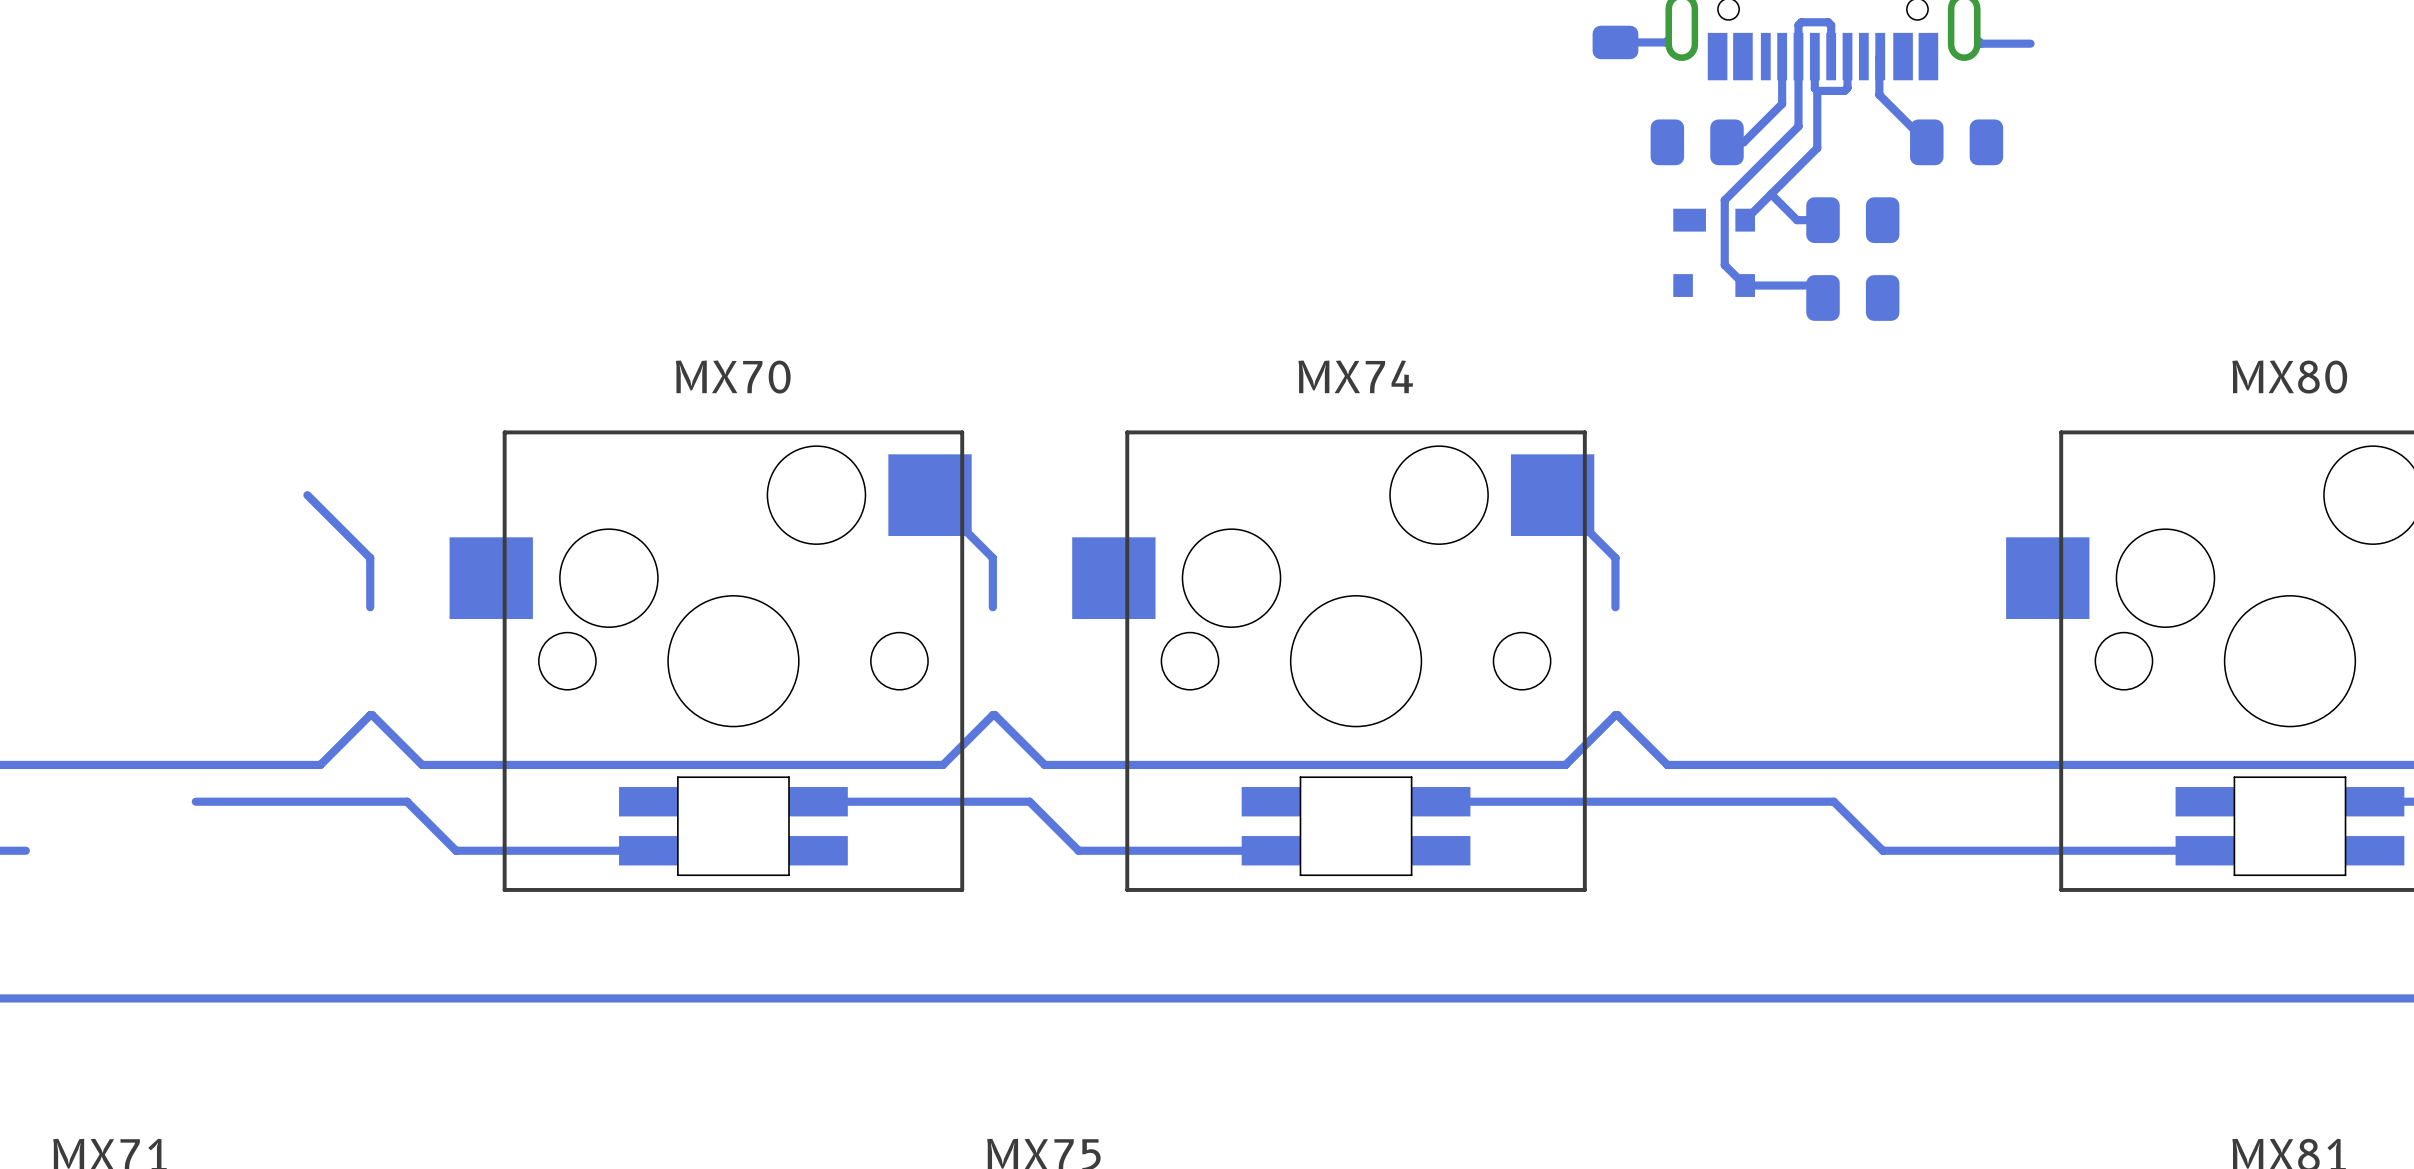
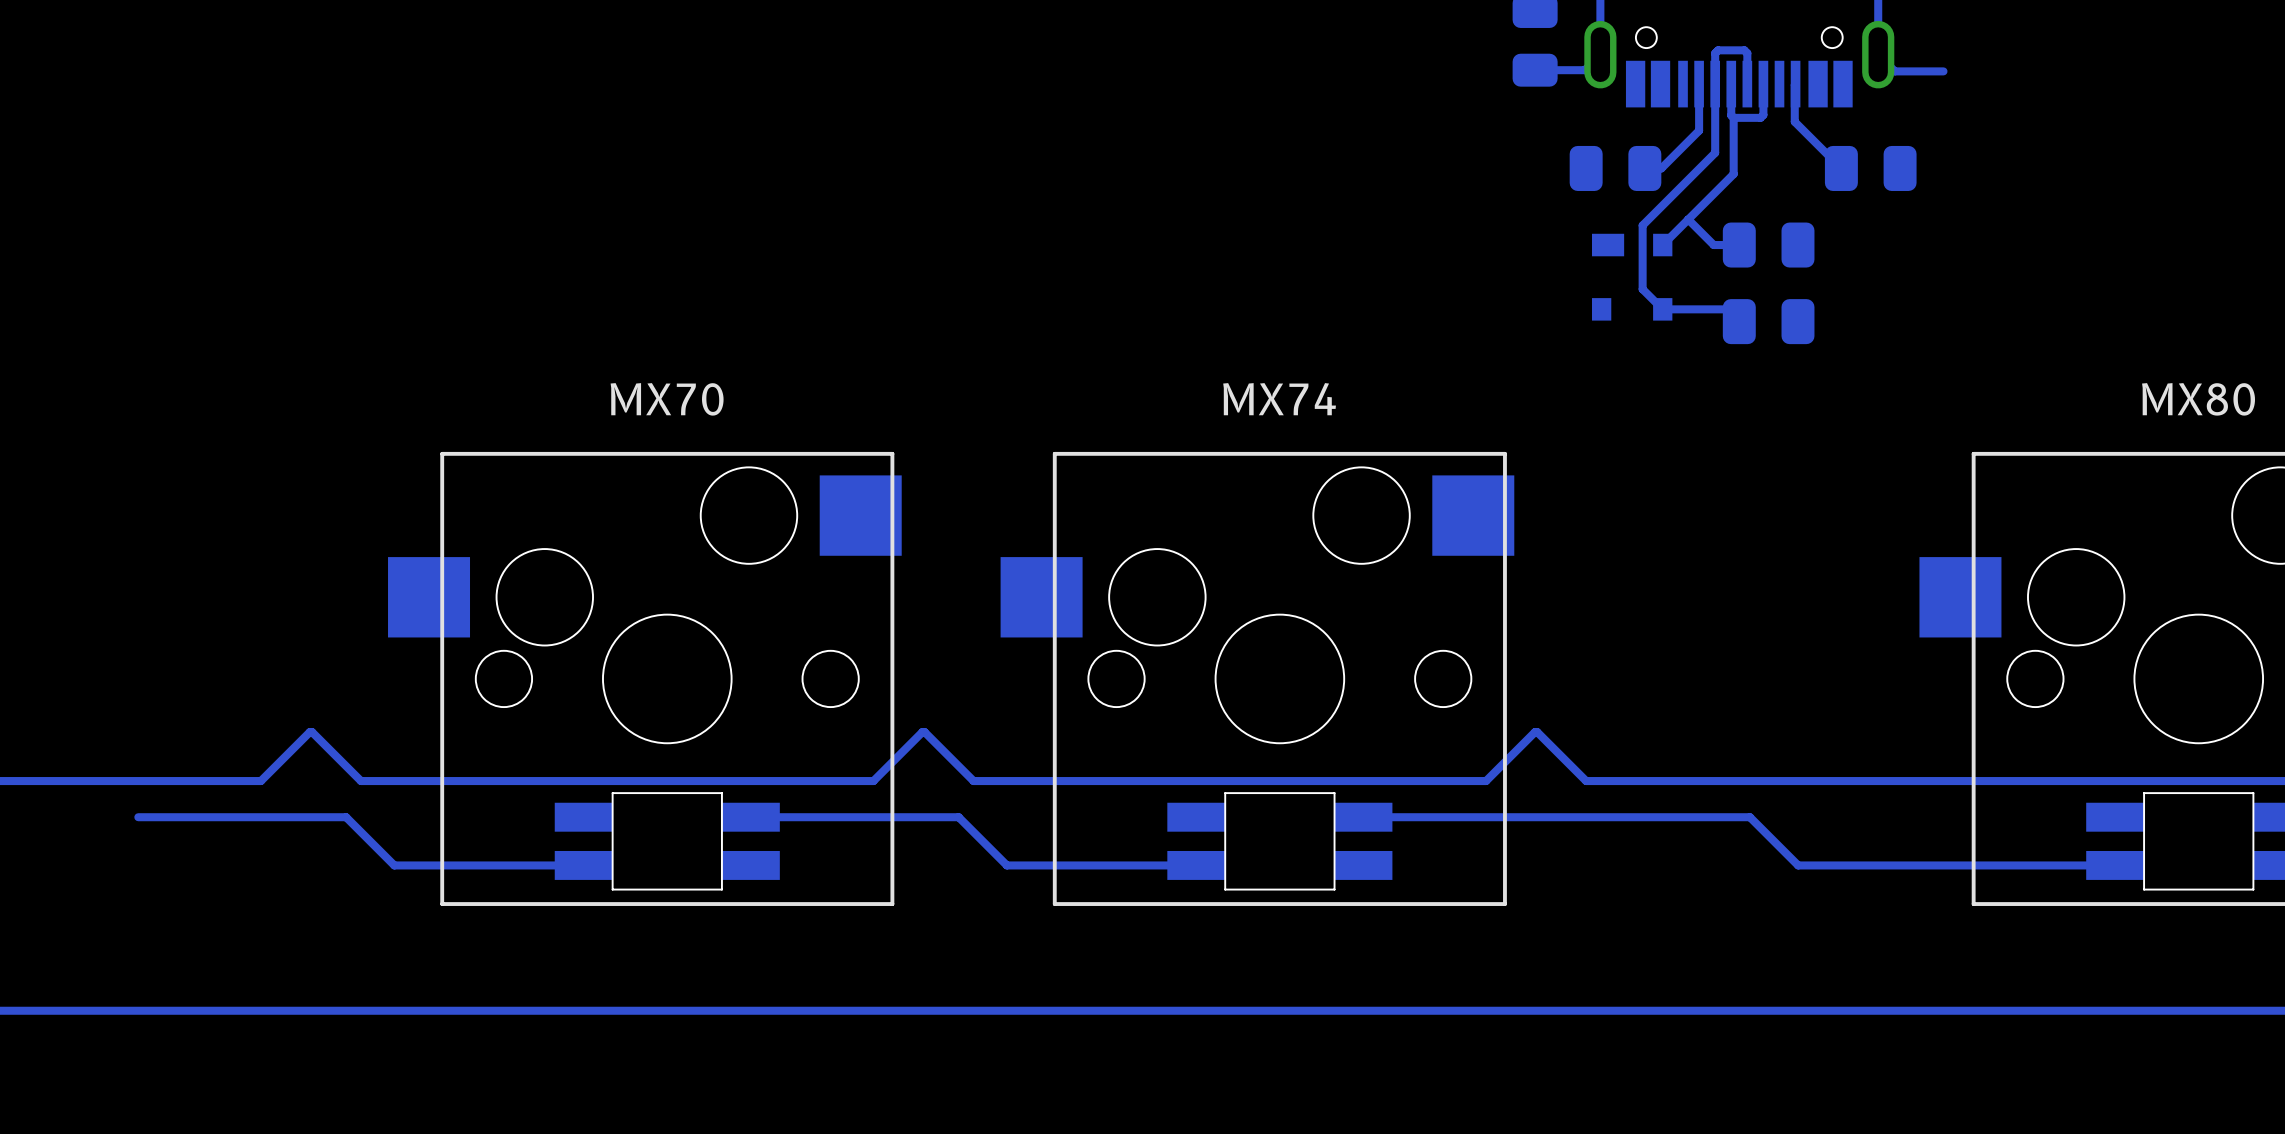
bottom track: (307, 495) (370, 557) (370, 607) -> none
bottom track: (930, 495) (992, 557) (992, 607) -> none
bottom track: (1552, 495) (1615, 557) (1615, 607) -> none

